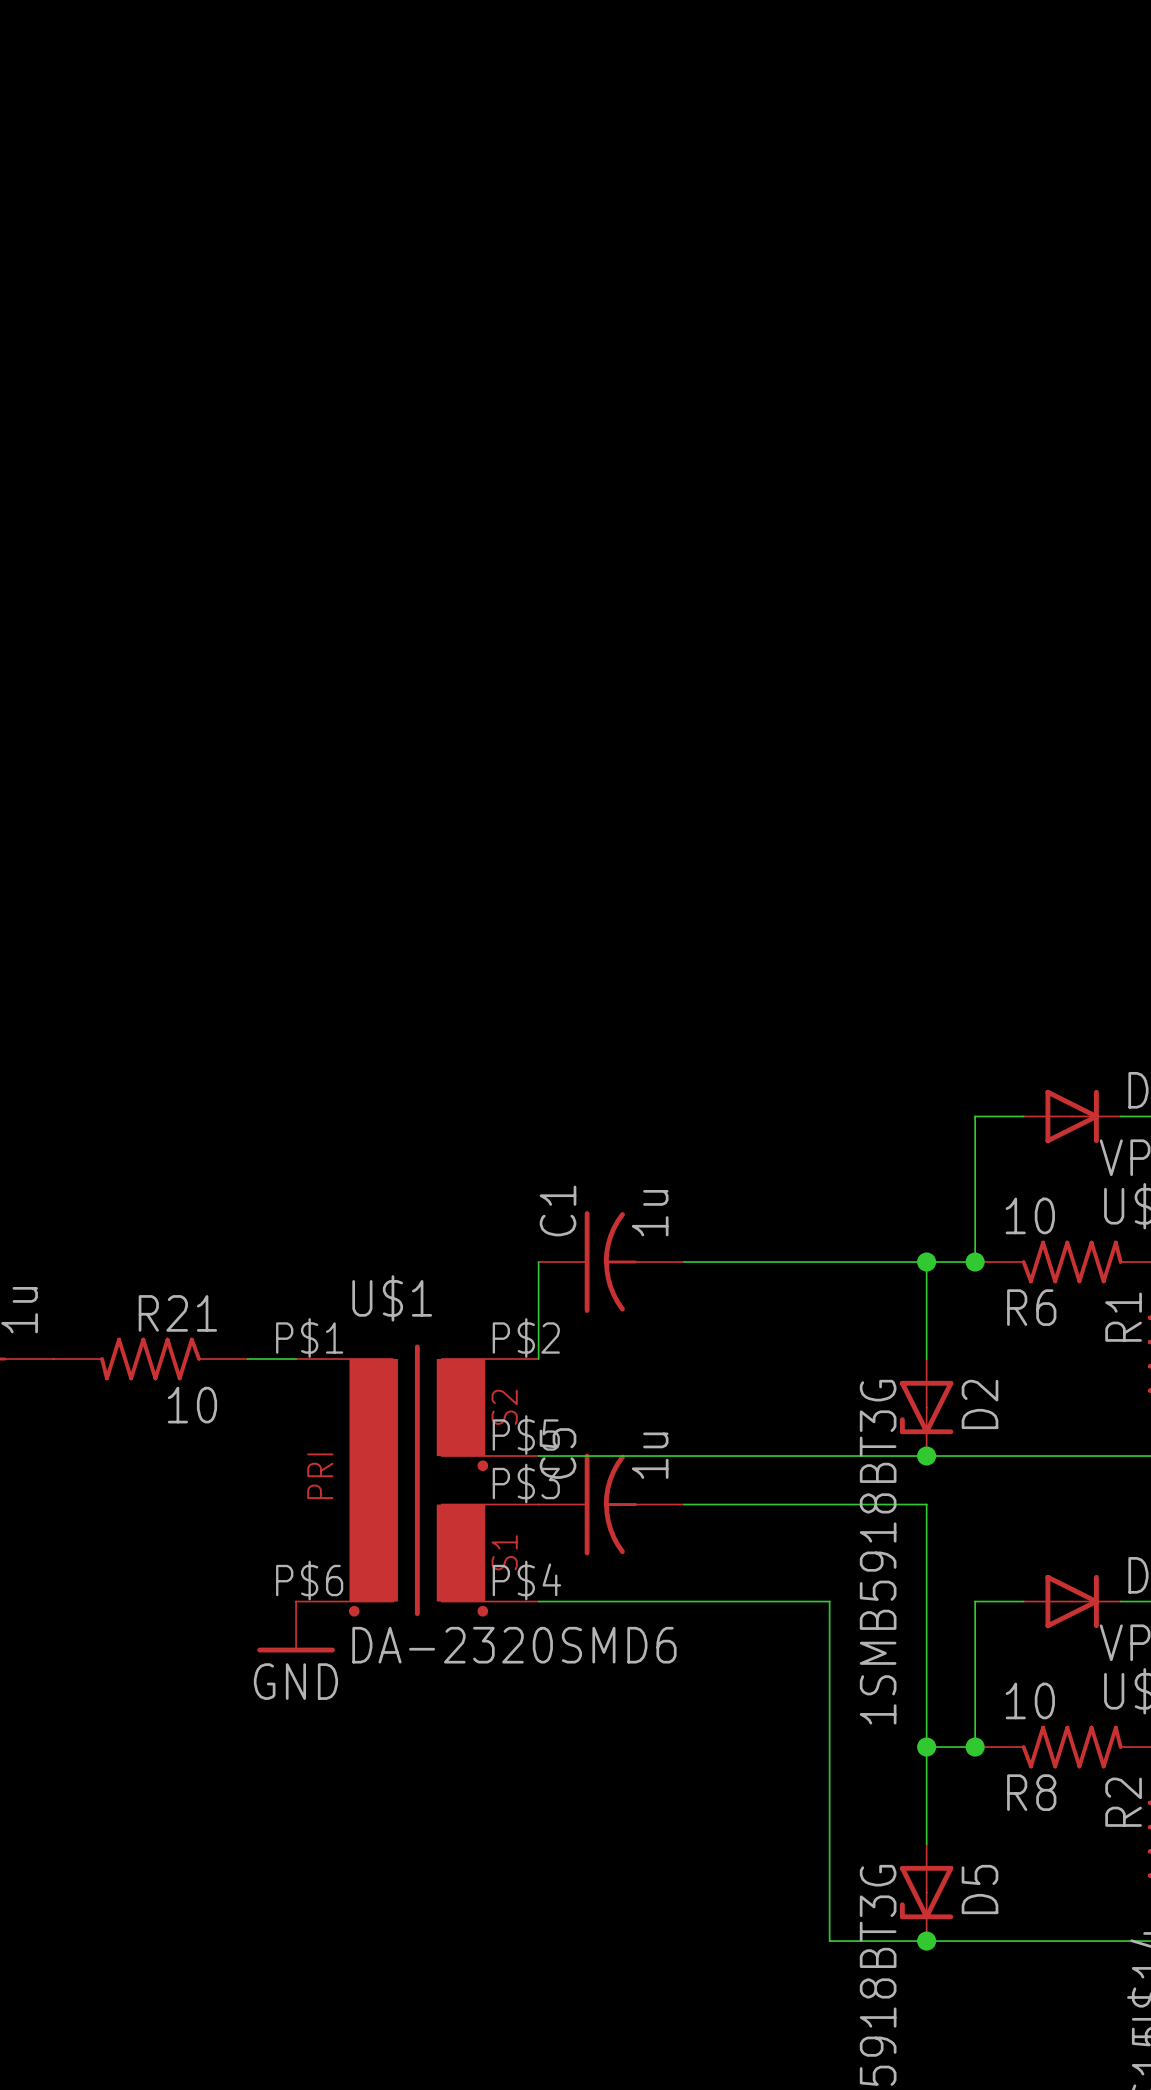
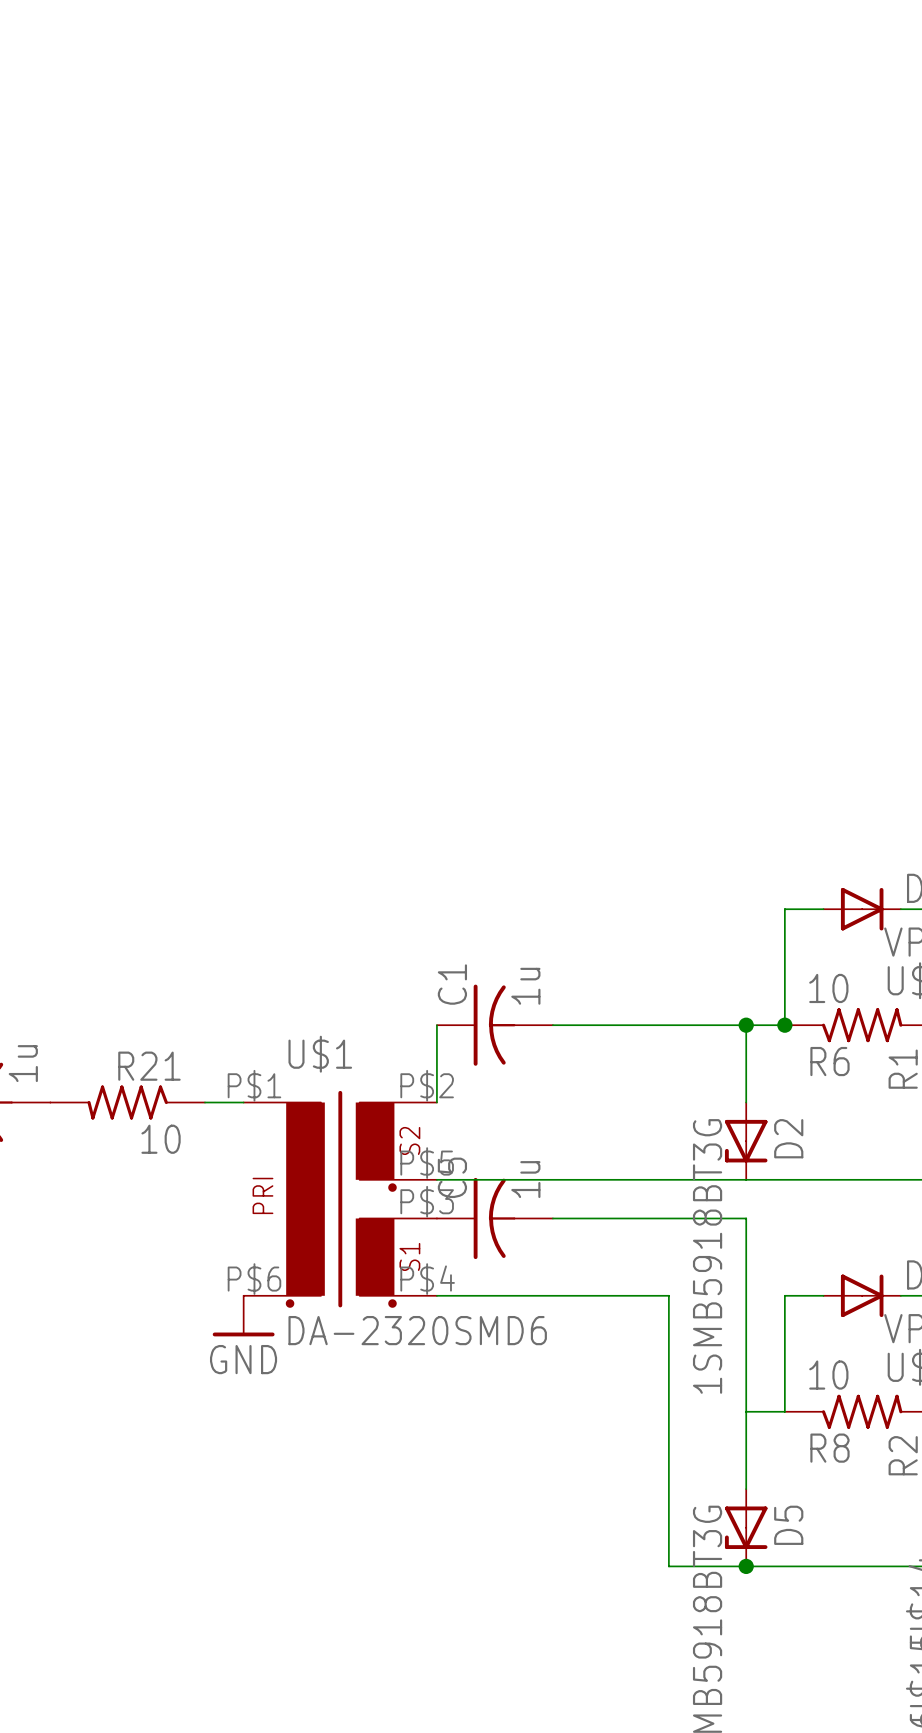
junction: (926, 1456) -> none
junction: (926, 1747) -> none
junction: (975, 1747) -> none

